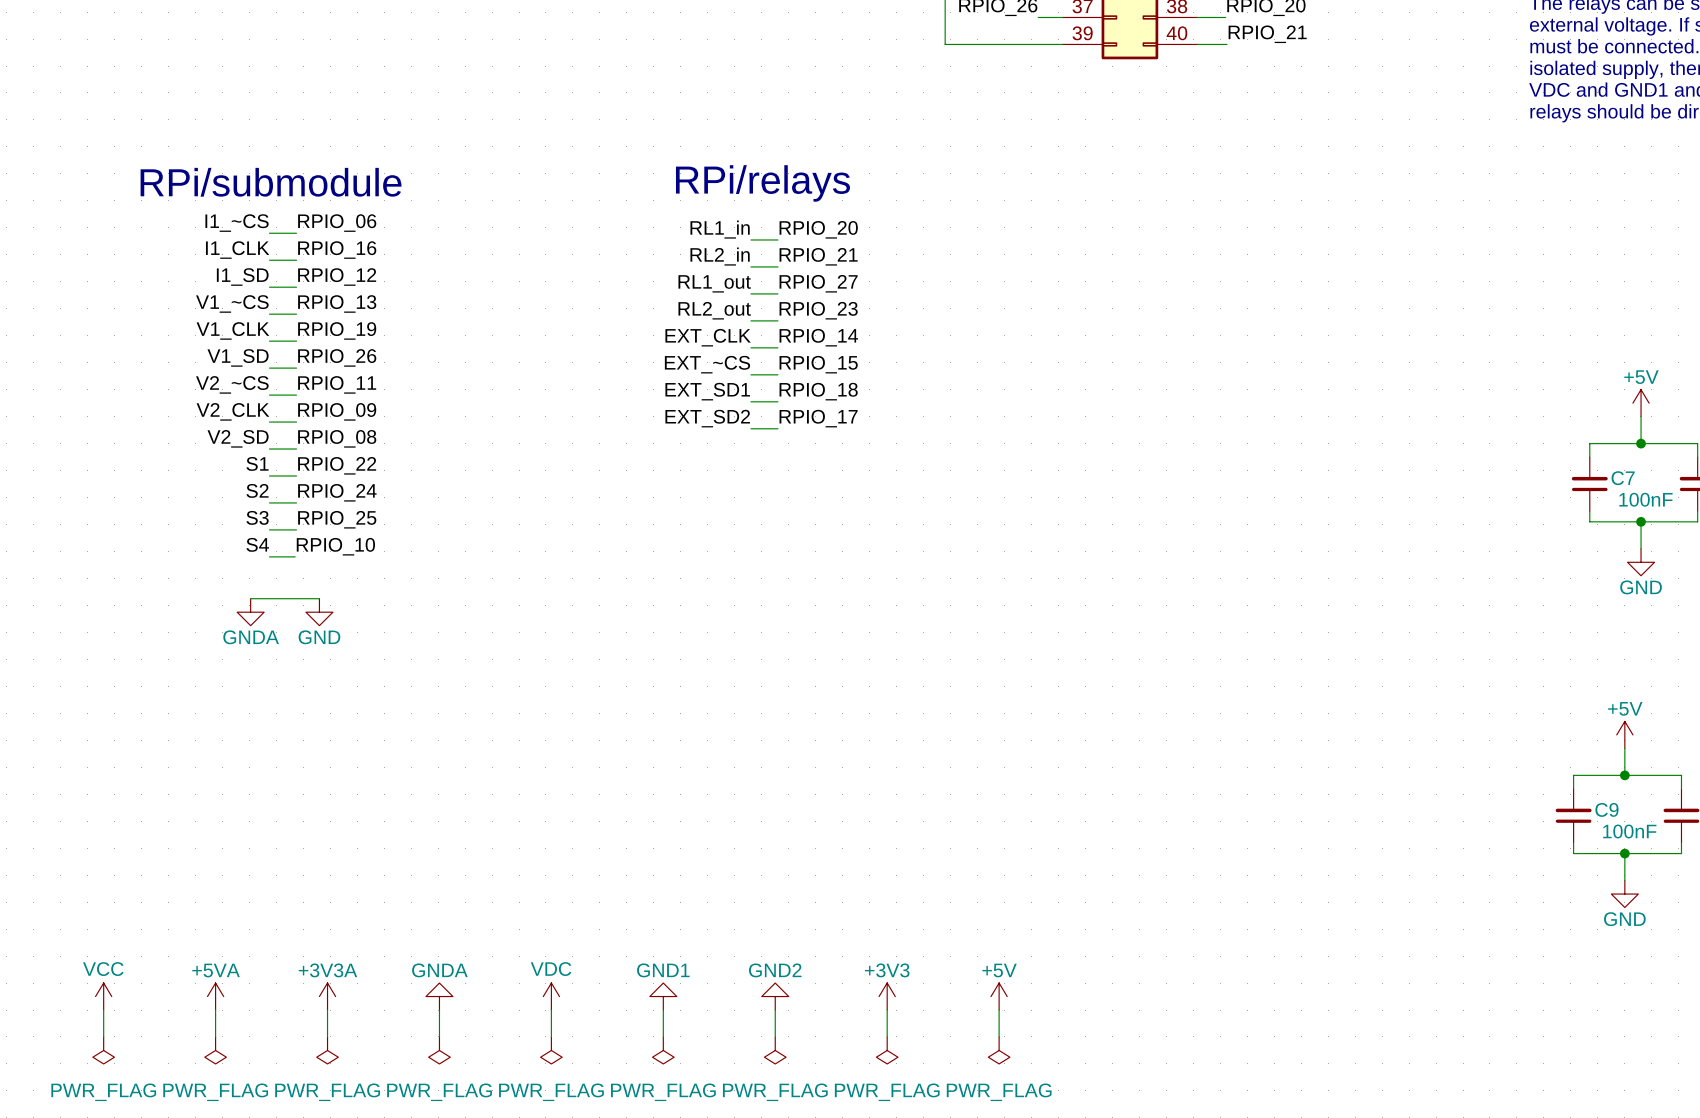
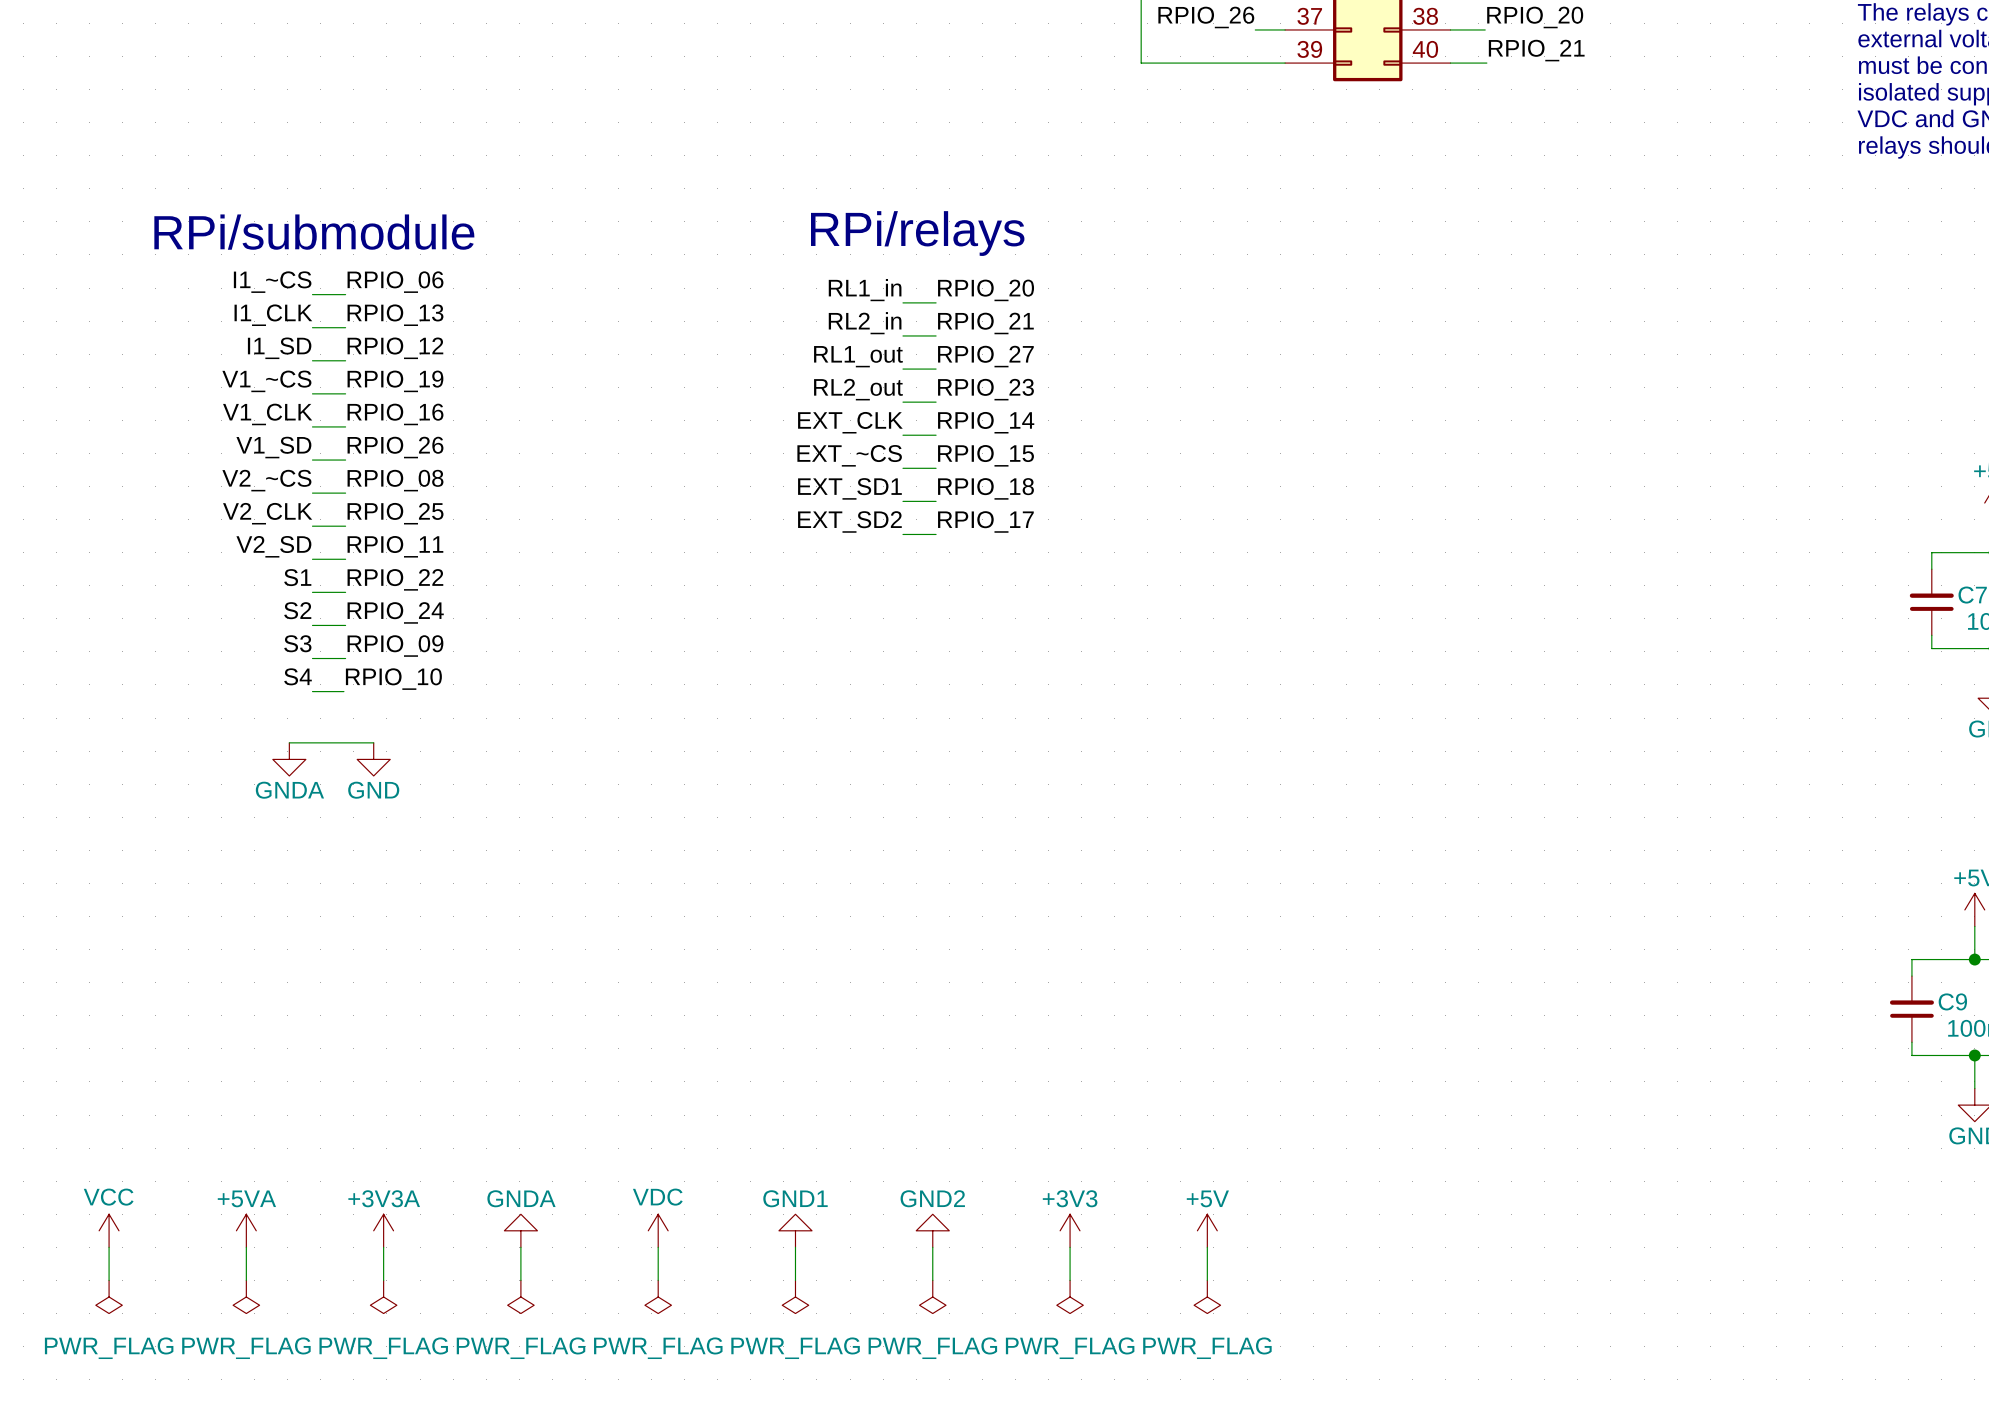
label: RPIO_16 (337, 250) -> RPIO_13 (395, 315)
label: RPIO_13 (337, 303) -> RPIO_19 (395, 381)
label: RPIO_19 (337, 330) -> RPIO_16 (395, 414)
label: RPIO_11 (337, 384) -> RPIO_08 (395, 480)
label: RPIO_09 (337, 411) -> RPIO_25 (395, 513)
label: RPIO_08 (337, 438) -> RPIO_11 (395, 546)
label: RPIO_25 (337, 519) -> RPIO_09 (395, 646)

